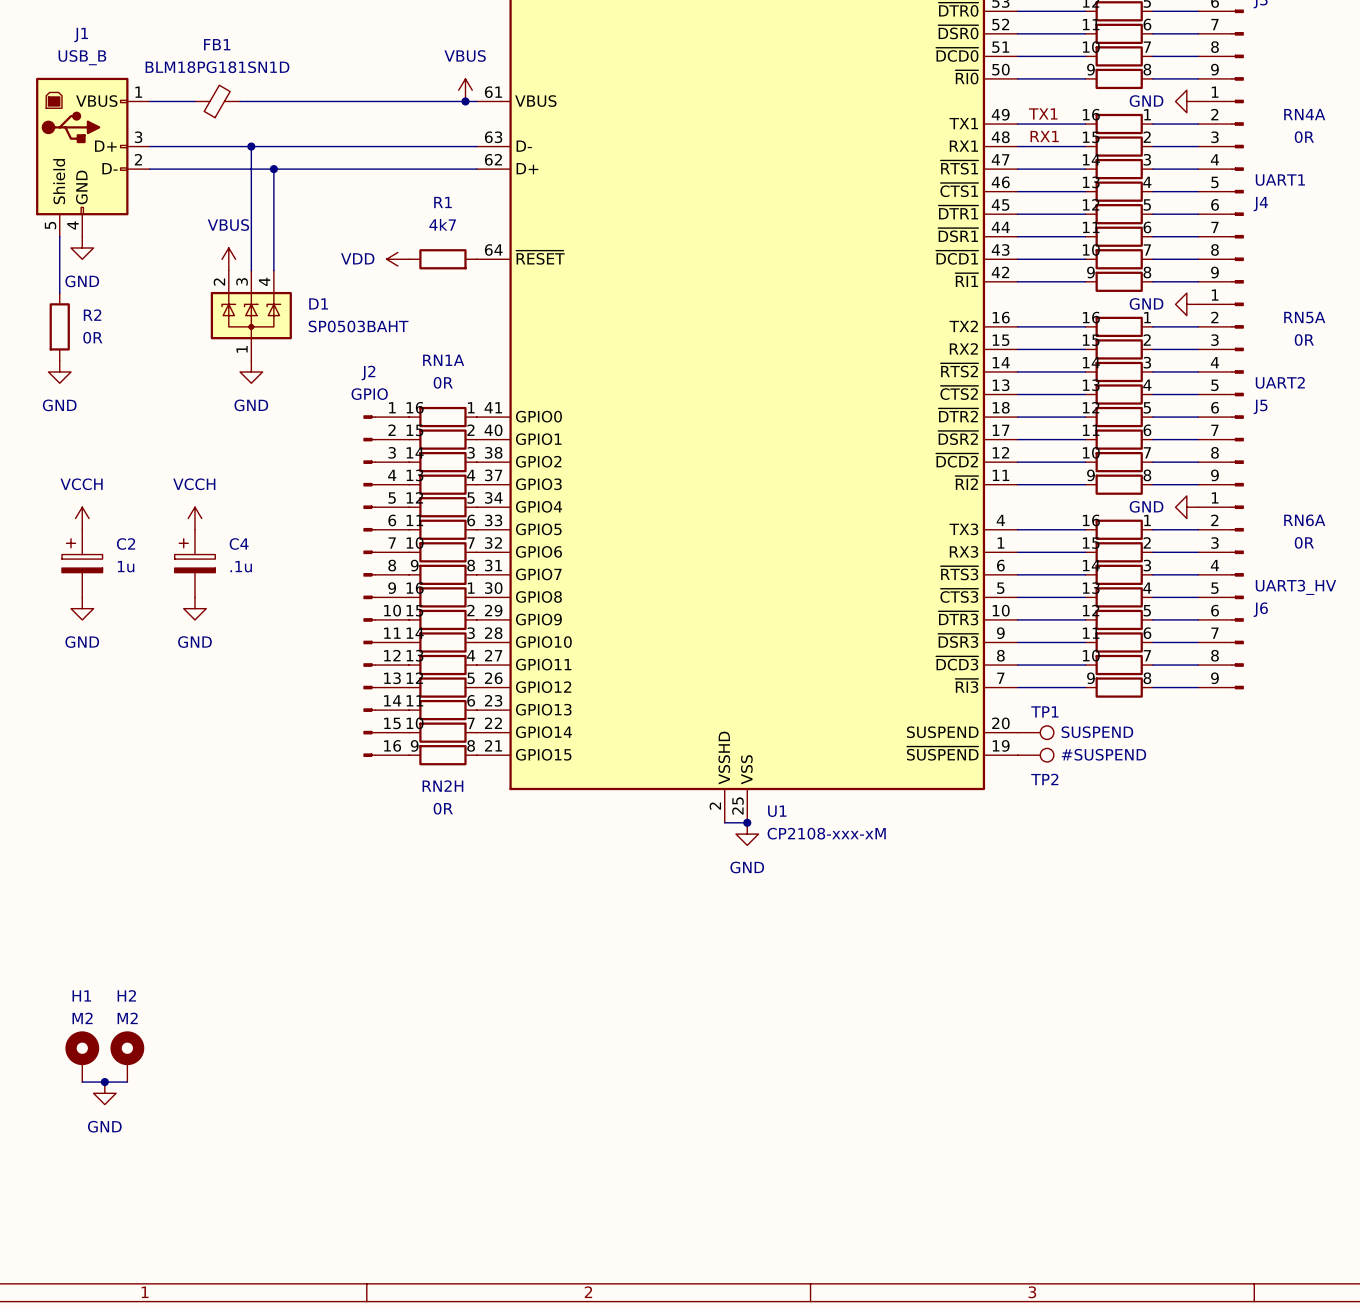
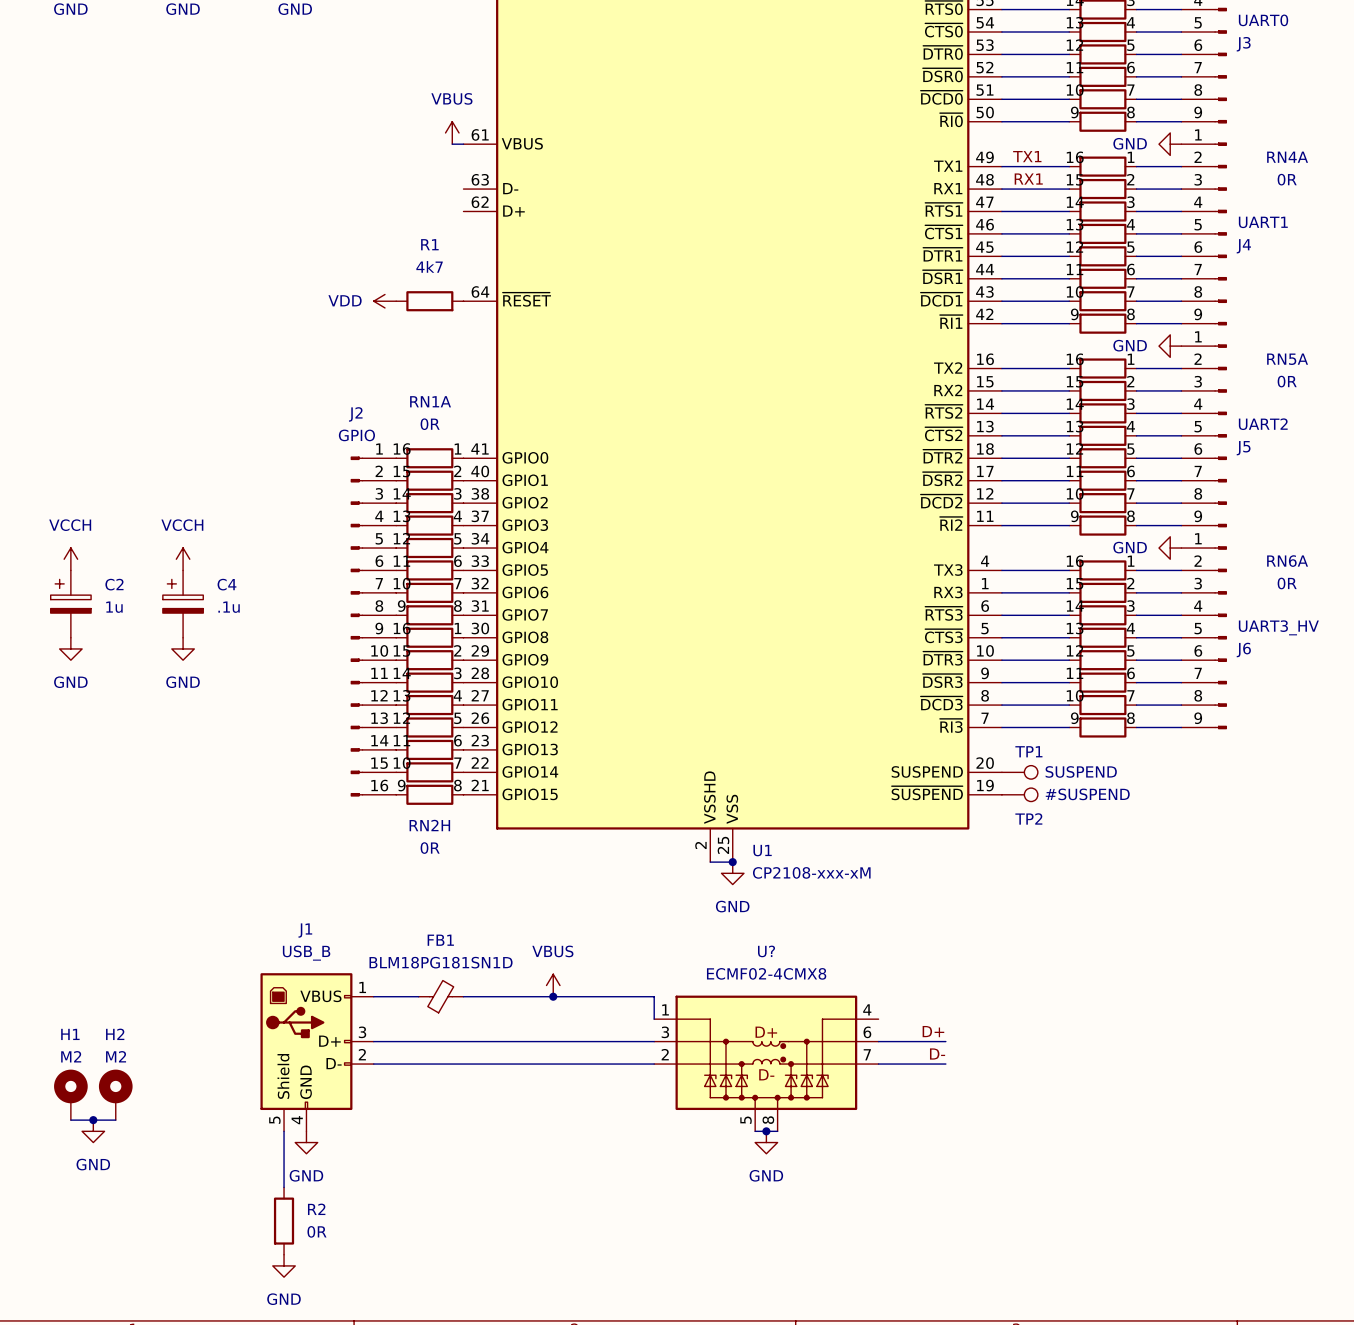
wire: (149, 101) (194, 101) -> none
FB1 position: (217, 101) -> (441, 996)
wire: (240, 101) (465, 101) -> none
junction: (465, 101) -> none
wire: (149, 146) (476, 146) -> none
wire: (251, 146) (251, 270) -> none
junction: (251, 146) -> none
J1 position: (92, 157) -> (317, 1052)
wire: (149, 169) (476, 169) -> none
wire: (273, 169) (273, 270) -> none
junction: (273, 169) -> none
wire: (59, 236) (59, 293) -> none
power symbol: GND (82, 248) -> none
power symbol: VBUS (228, 259) -> none
D1: SP0503BAHT (251, 315) -> none
R2 position: (59, 326) -> (284, 1221)
power symbol: GND (59, 371) -> none
power symbol: GND (251, 371) -> none
power symbol: none -> VBUS (553, 985)
wire: none -> (373, 996) (418, 996)
wire: none -> (463, 996) (654, 996) (654, 1019)
junction: none -> (553, 996)
label: none -> D+ (933, 1031)
wire: none -> (373, 1041) (654, 1041)
wire: none -> (878, 1041) (945, 1041)
label: none -> D- (937, 1054)
wire: none -> (373, 1064) (654, 1064)
U?: none -> ECMF02-4CMX8 (766, 1063)
wire: none -> (878, 1064) (945, 1064)
wire: none -> (284, 1131) (284, 1187)
wire: none -> (755, 1131) (777, 1131)
junction: none -> (766, 1131)
power symbol: none -> GND (306, 1142)
power symbol: none -> GND (766, 1142)
power symbol: none -> GND (284, 1265)

